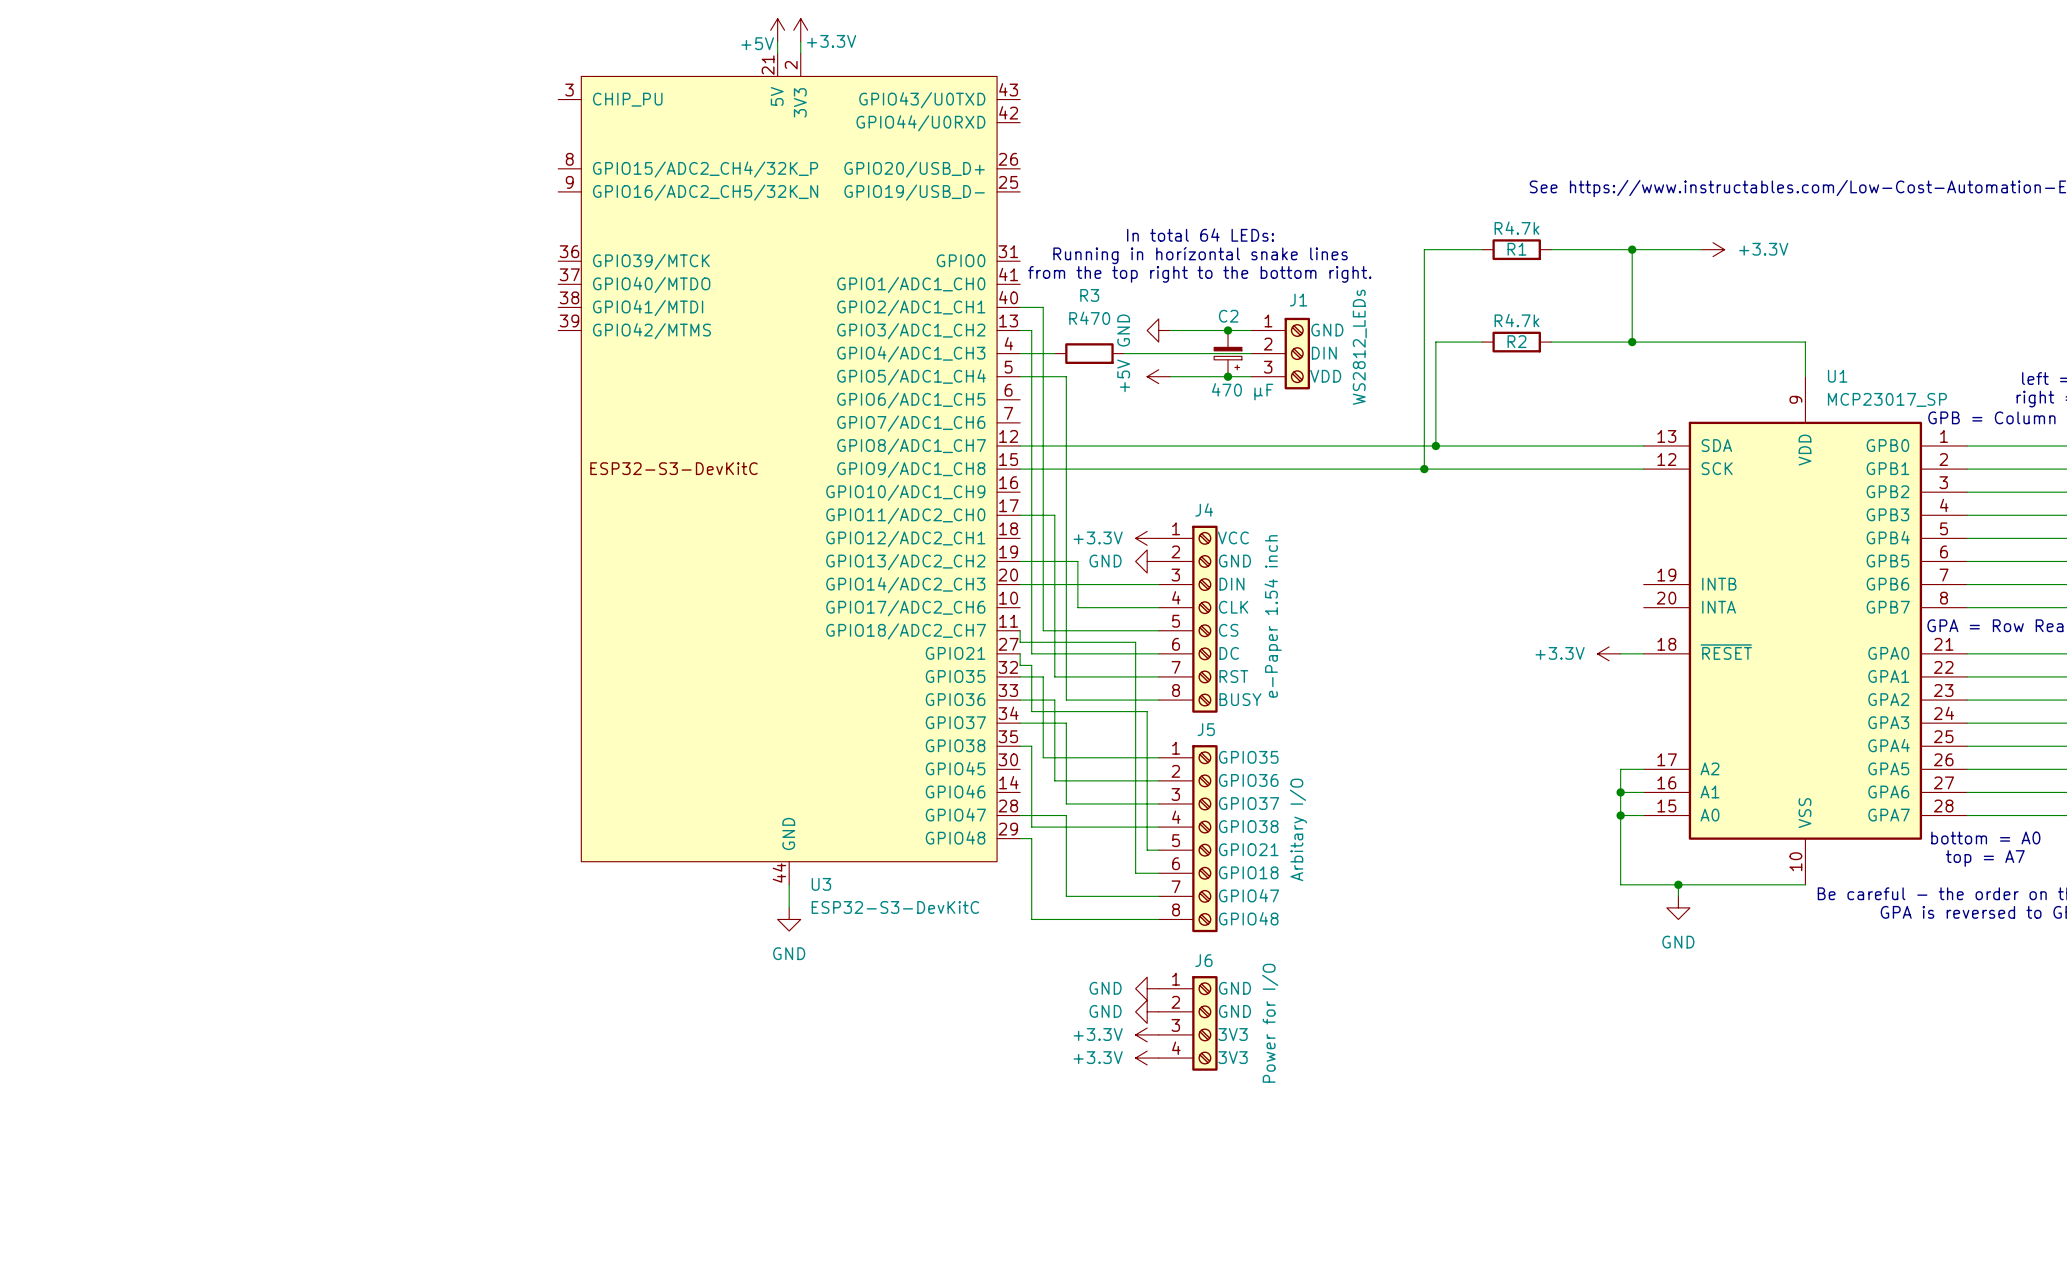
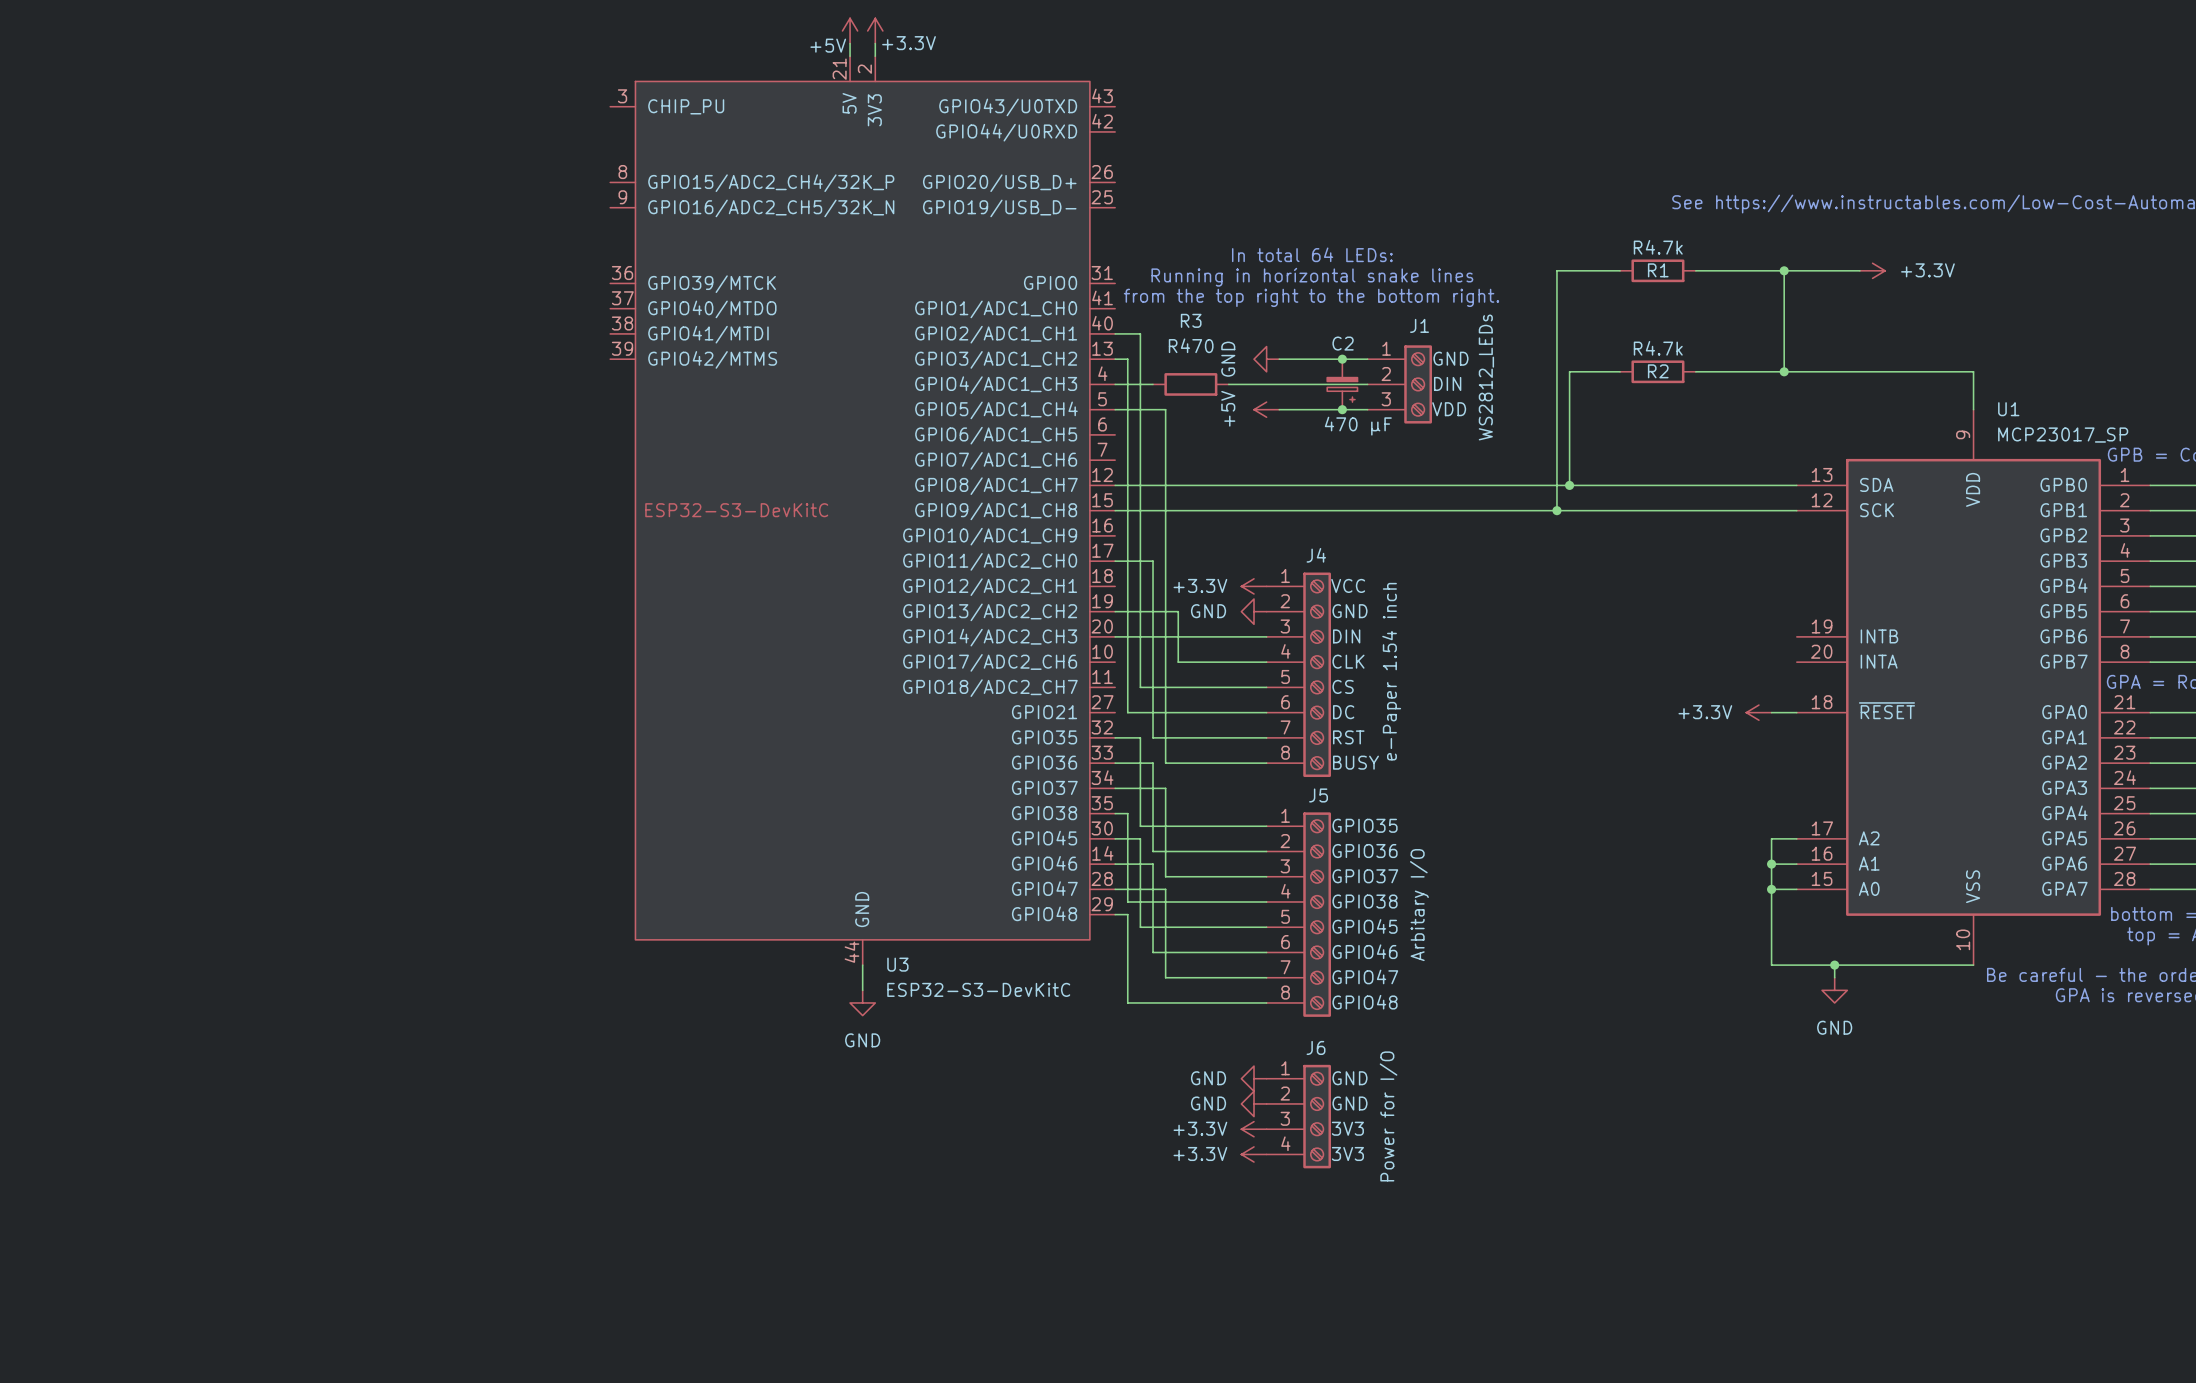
wire: (1020, 630) (1020, 642) (1135, 642) (1135, 873) -> (1115, 864) (1153, 864) (1153, 952) (1241, 952)
wire: (1020, 653) (1020, 665) (1031, 665) (1031, 711) (1147, 711) (1147, 850) -> (1115, 838) (1140, 838) (1140, 927) (1254, 927)
J5 pin name: GPIO21 (1248, 849) -> GPIO45 (1365, 926)
J5 pin name: GPIO18 (1248, 872) -> GPIO46 (1365, 951)

